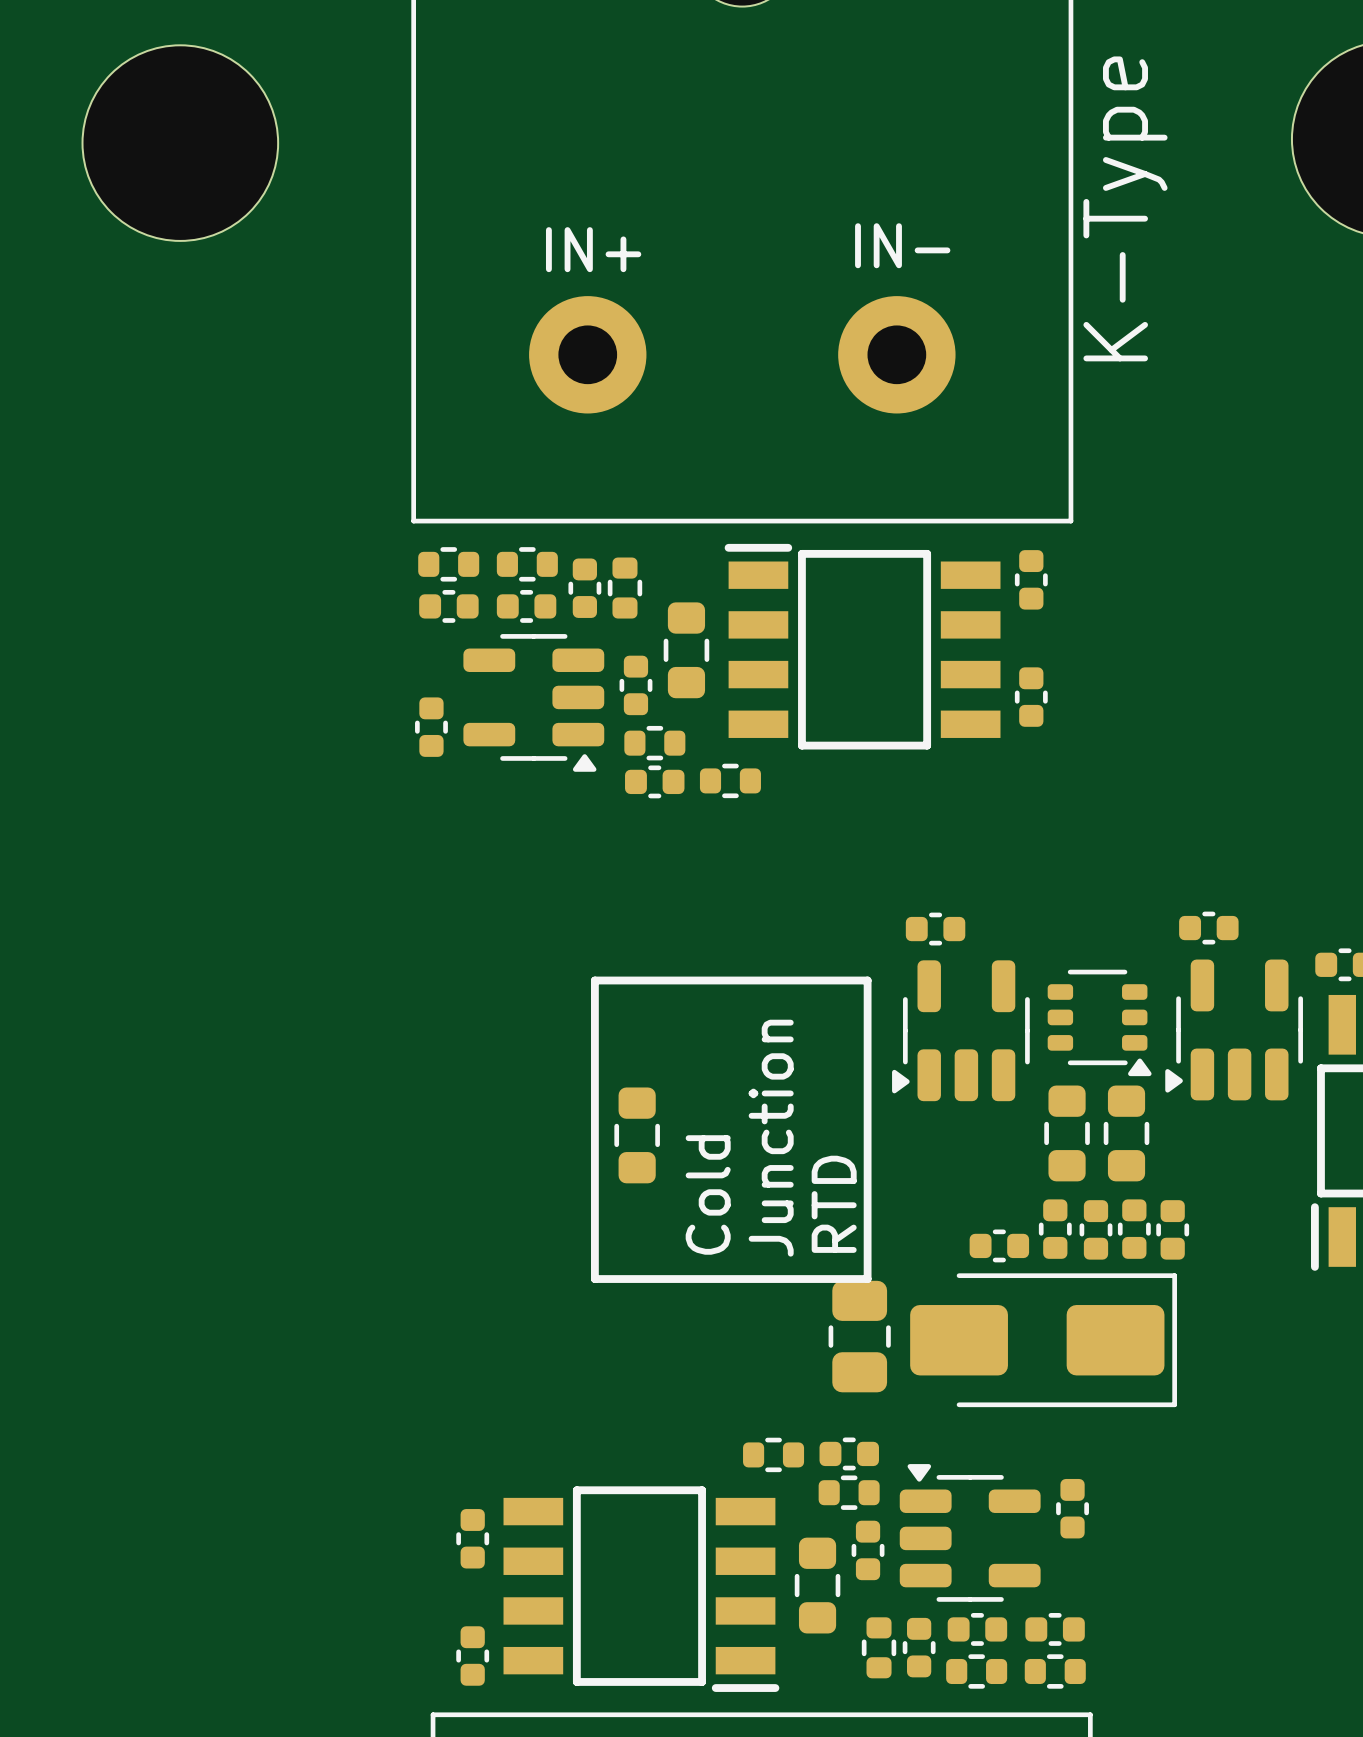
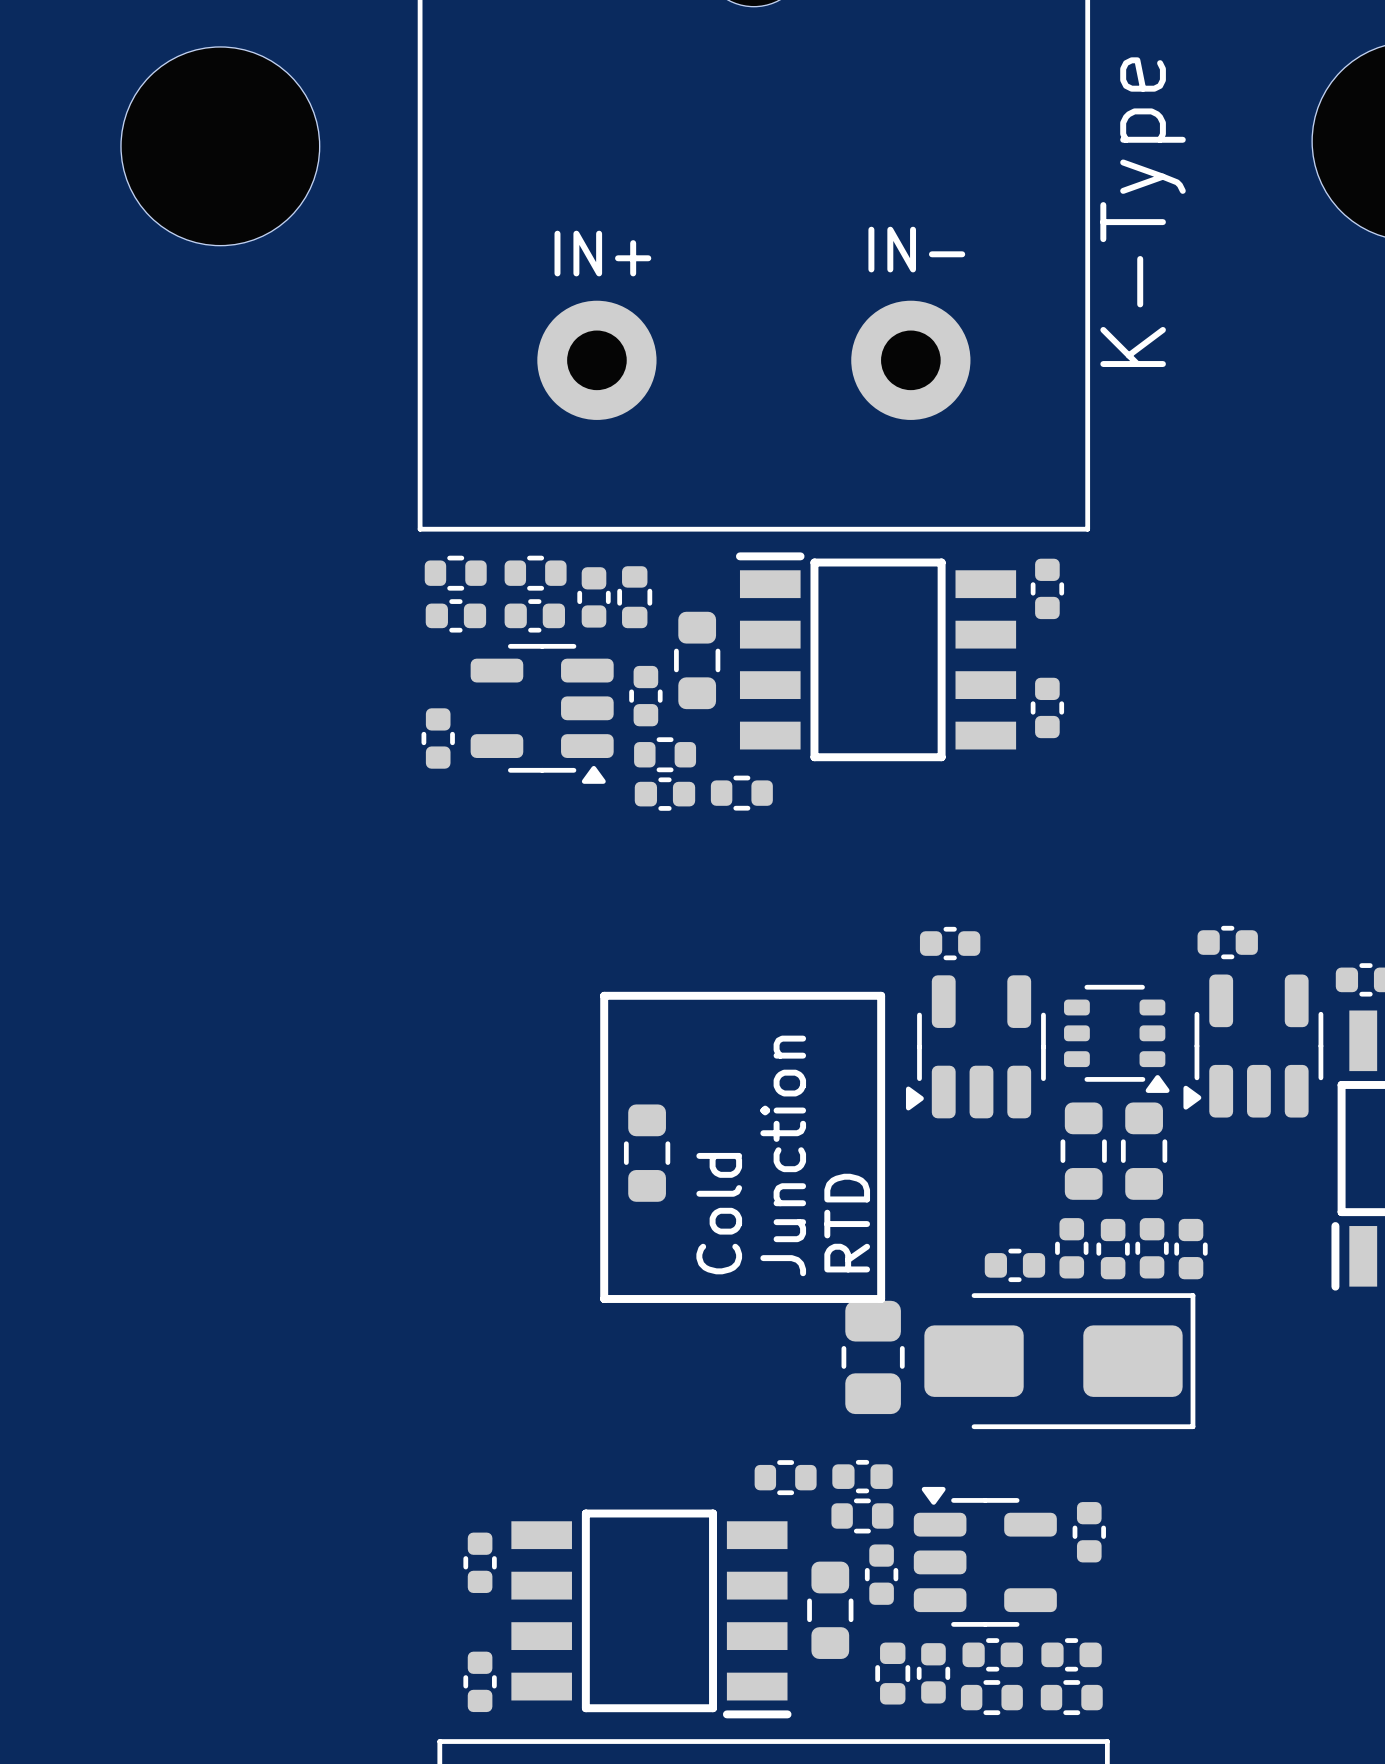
part position: (180, 143) -> (220, 146)

